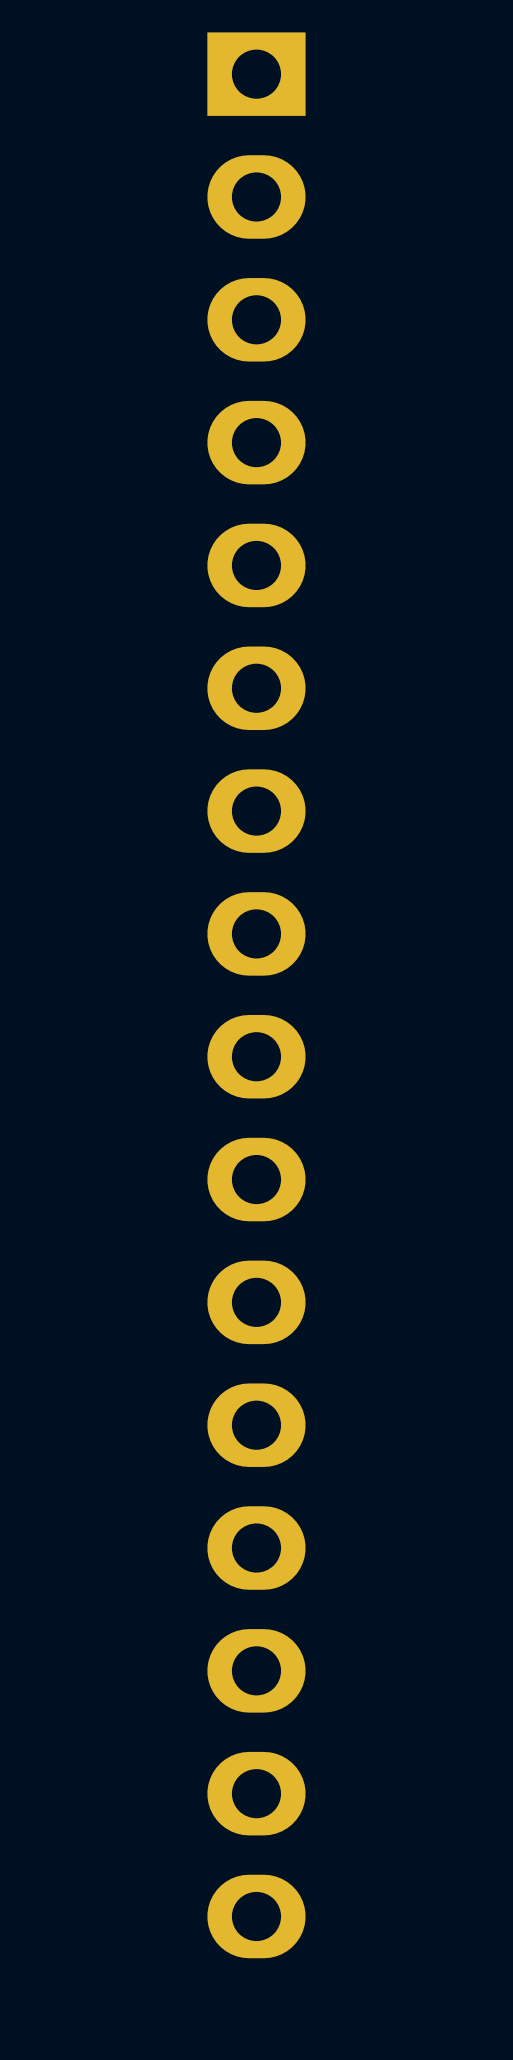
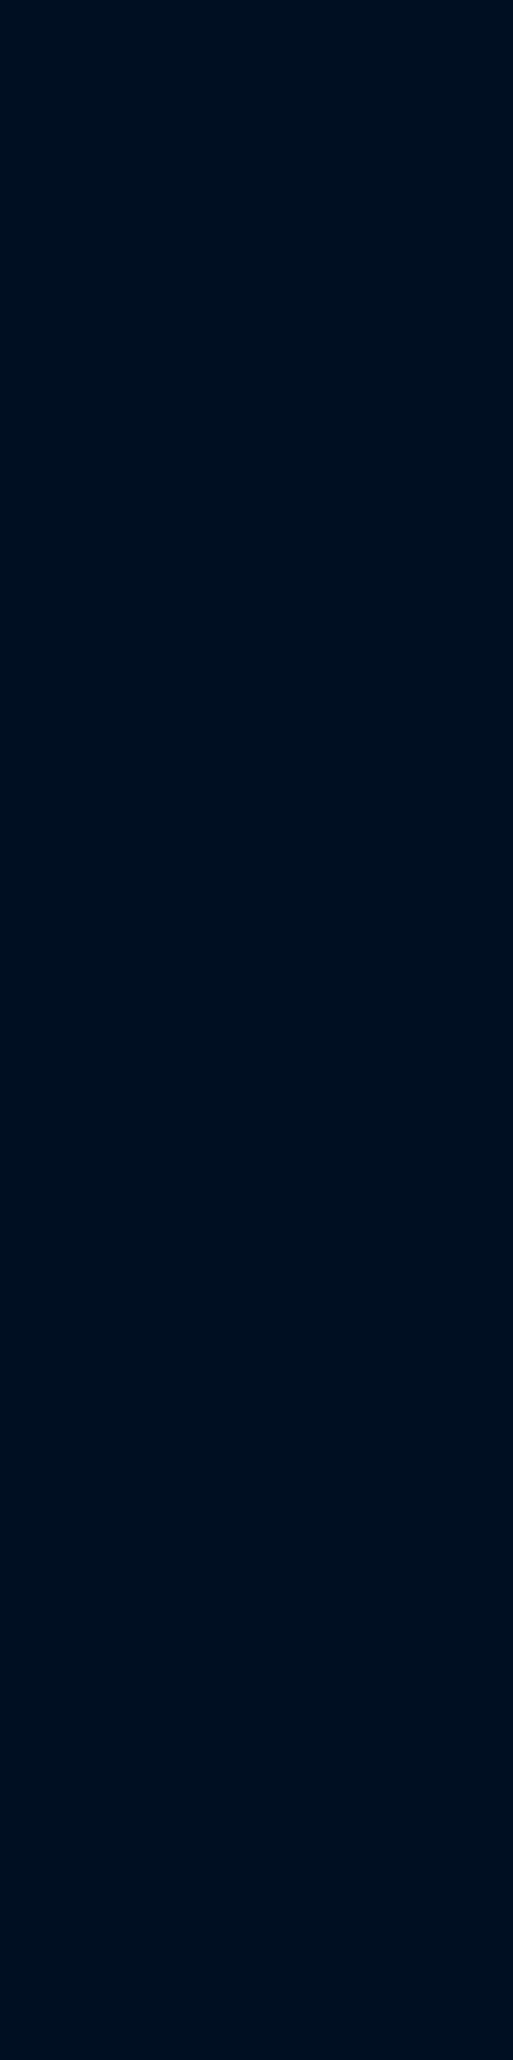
part: (256, 995) -> none

